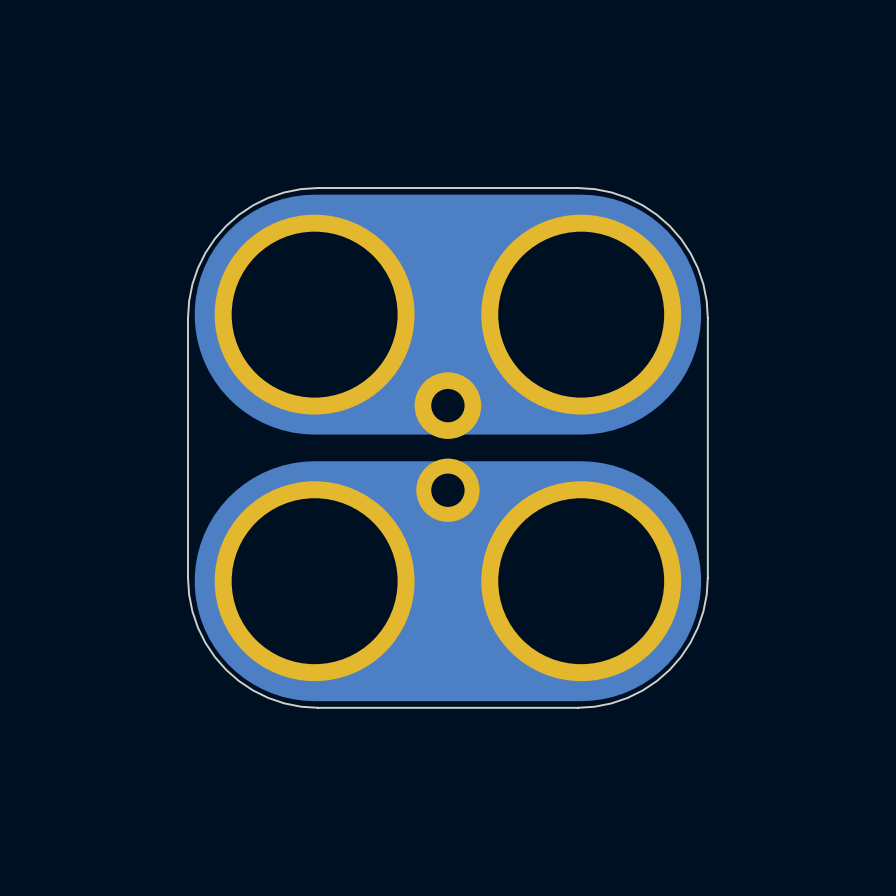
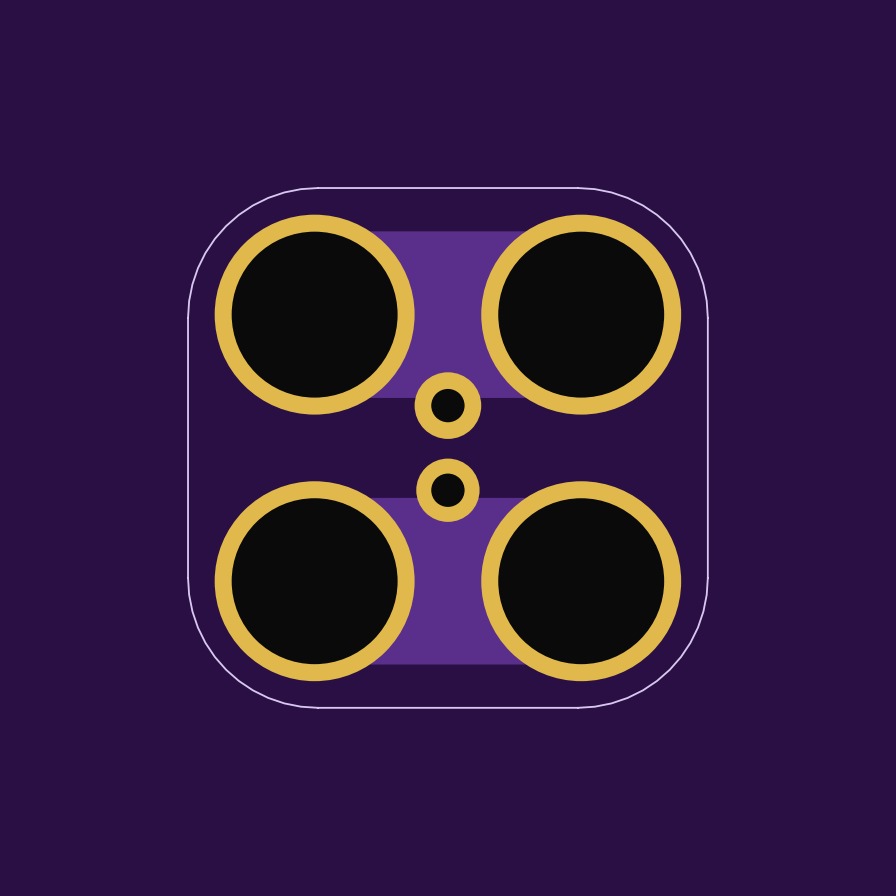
part footprint: [187, 187, 709, 709] -> [187, 187, 709, 709]

